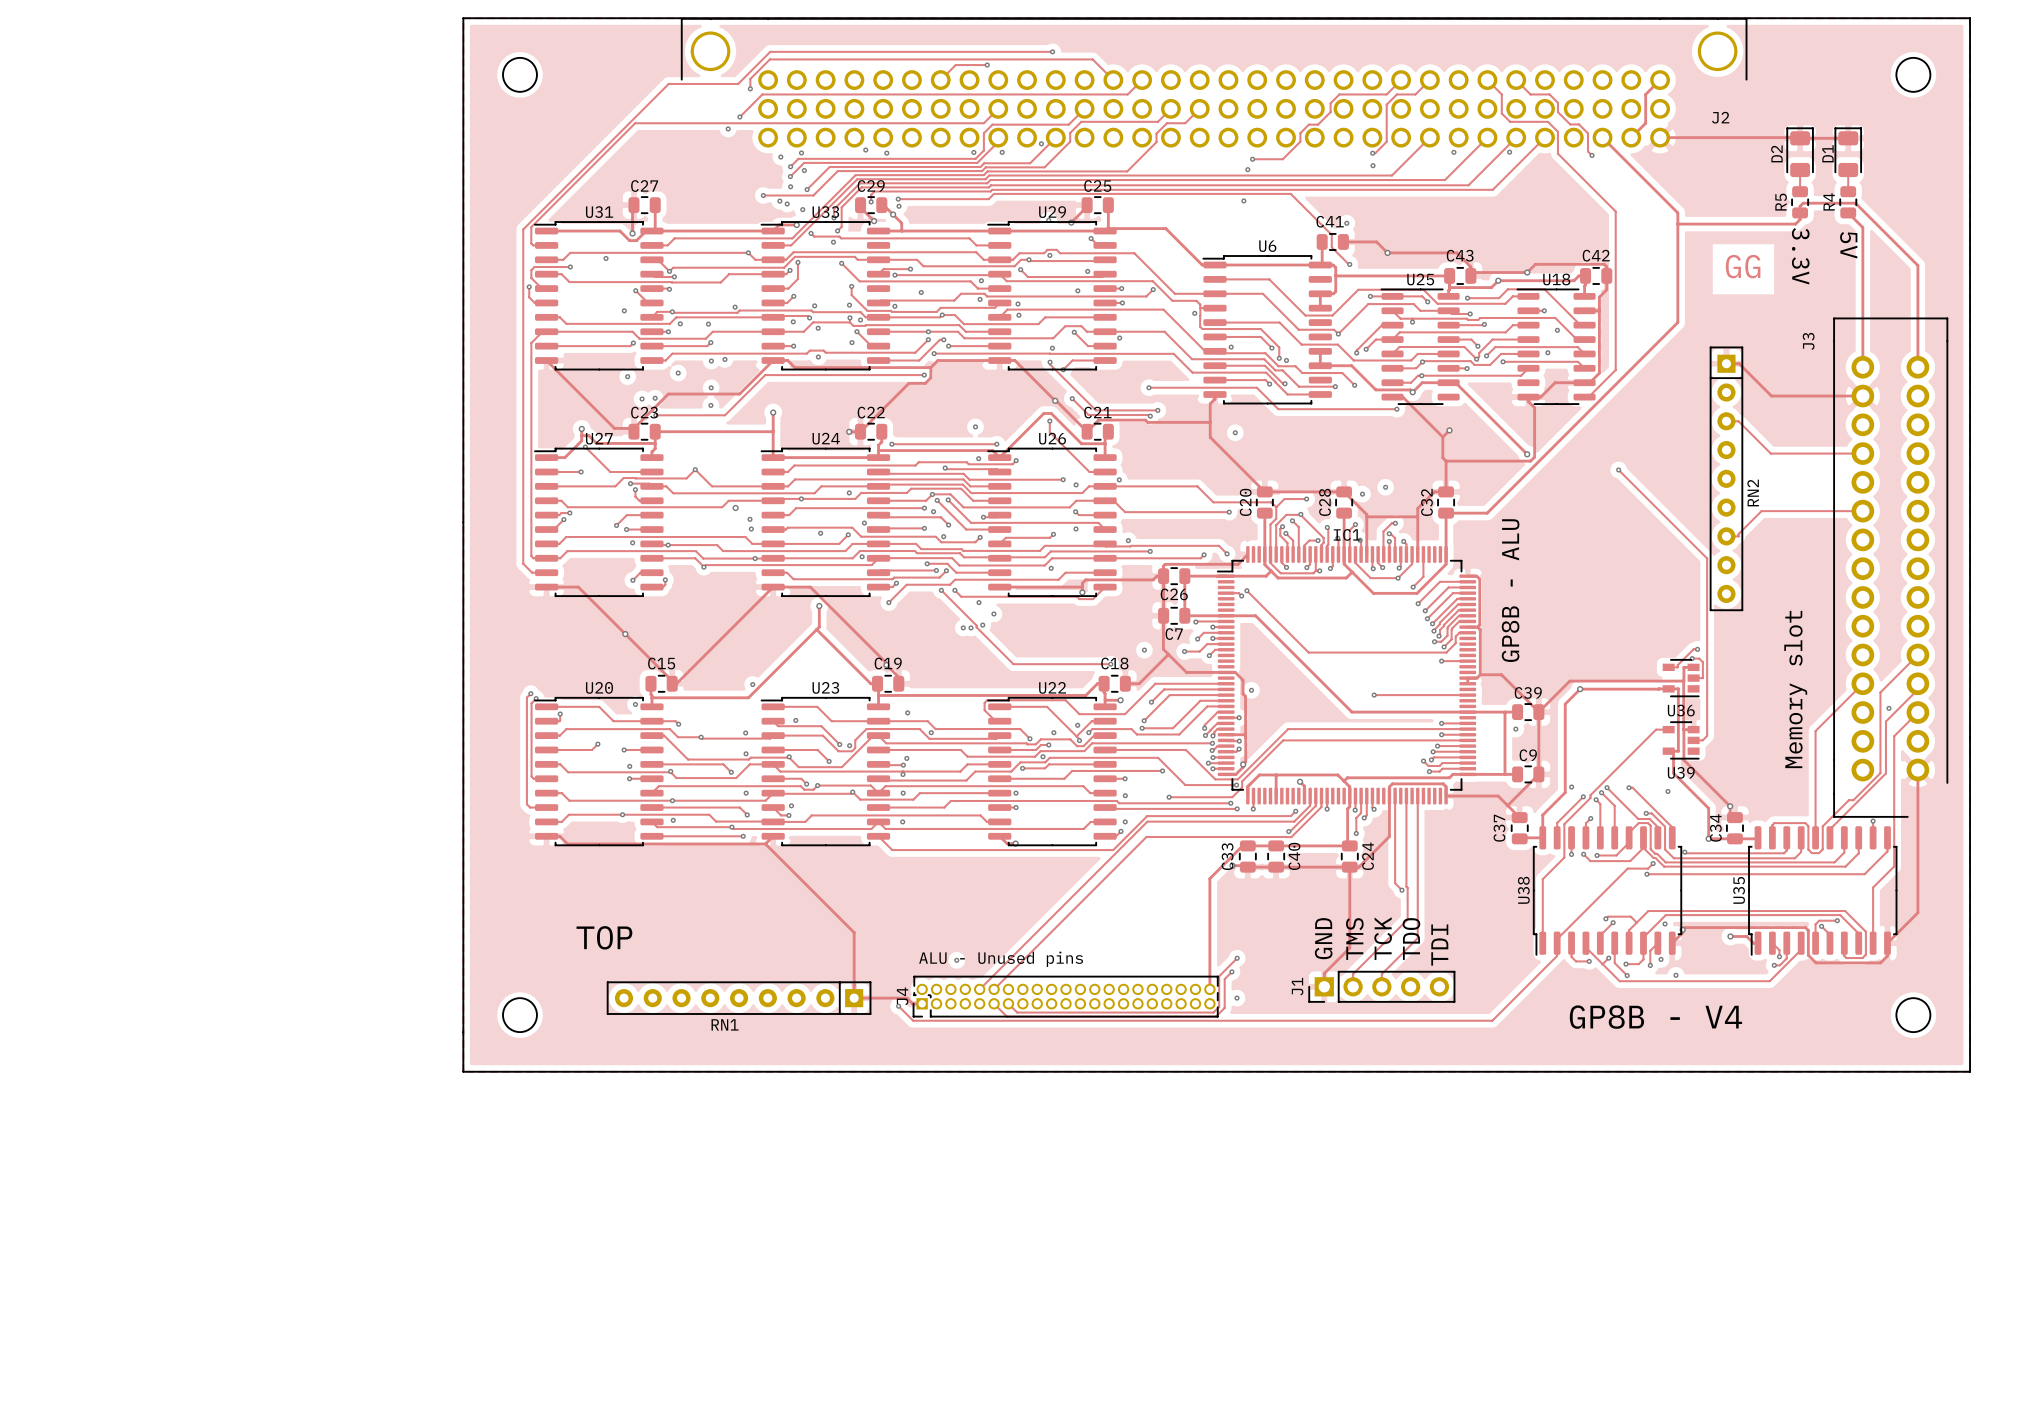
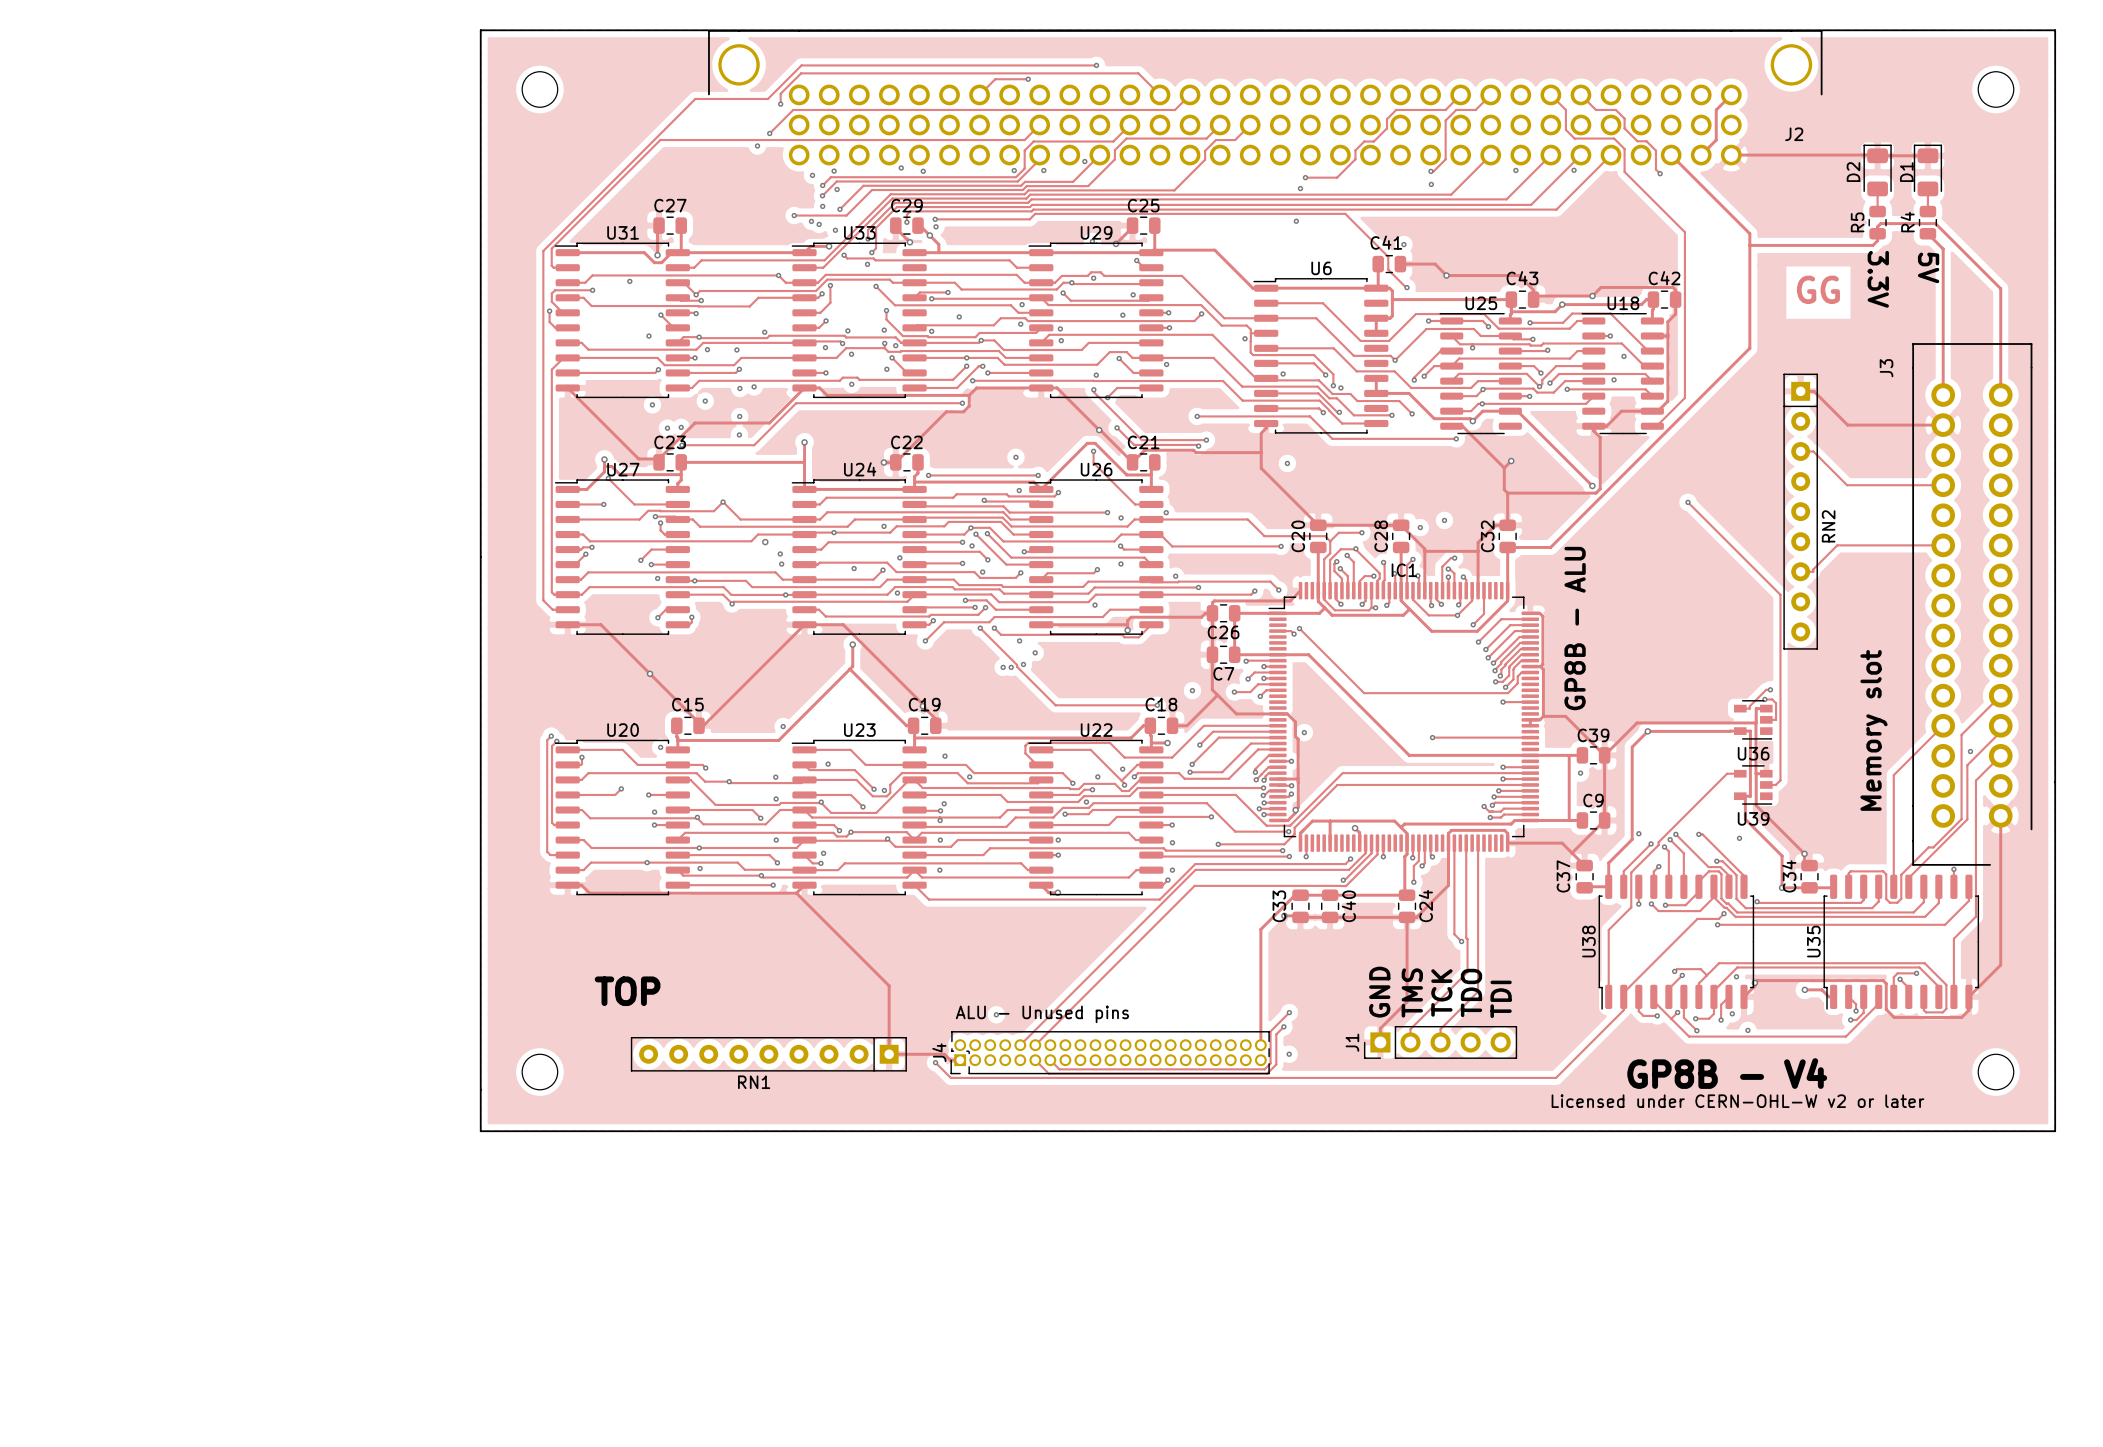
text: none -> Licensed under CERN-OHL-W v2 or later (1737, 1101)

